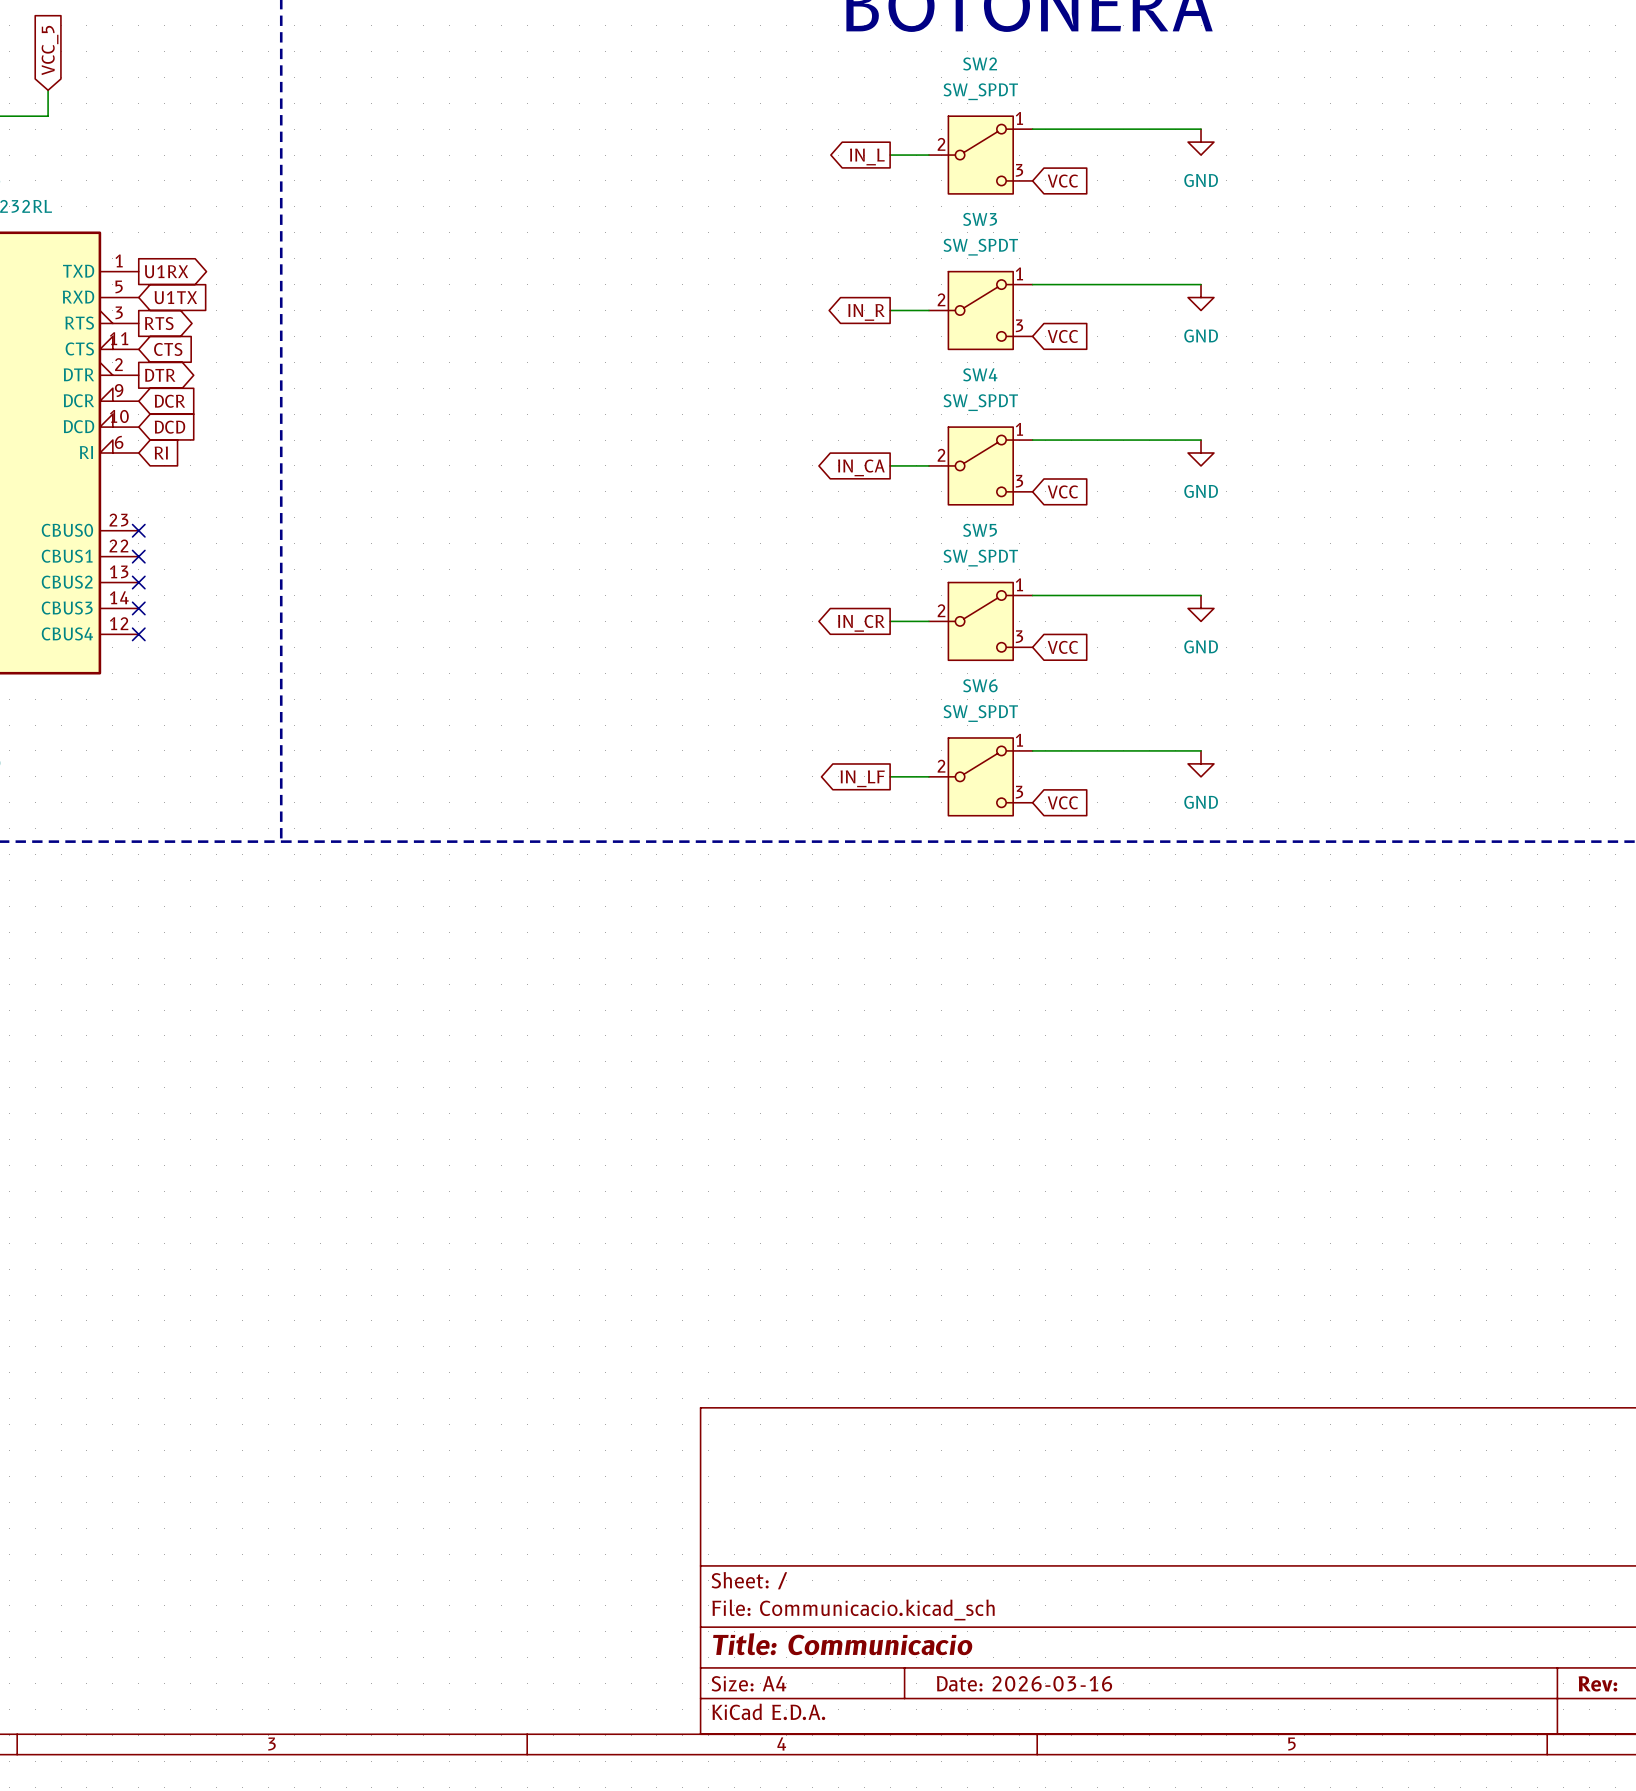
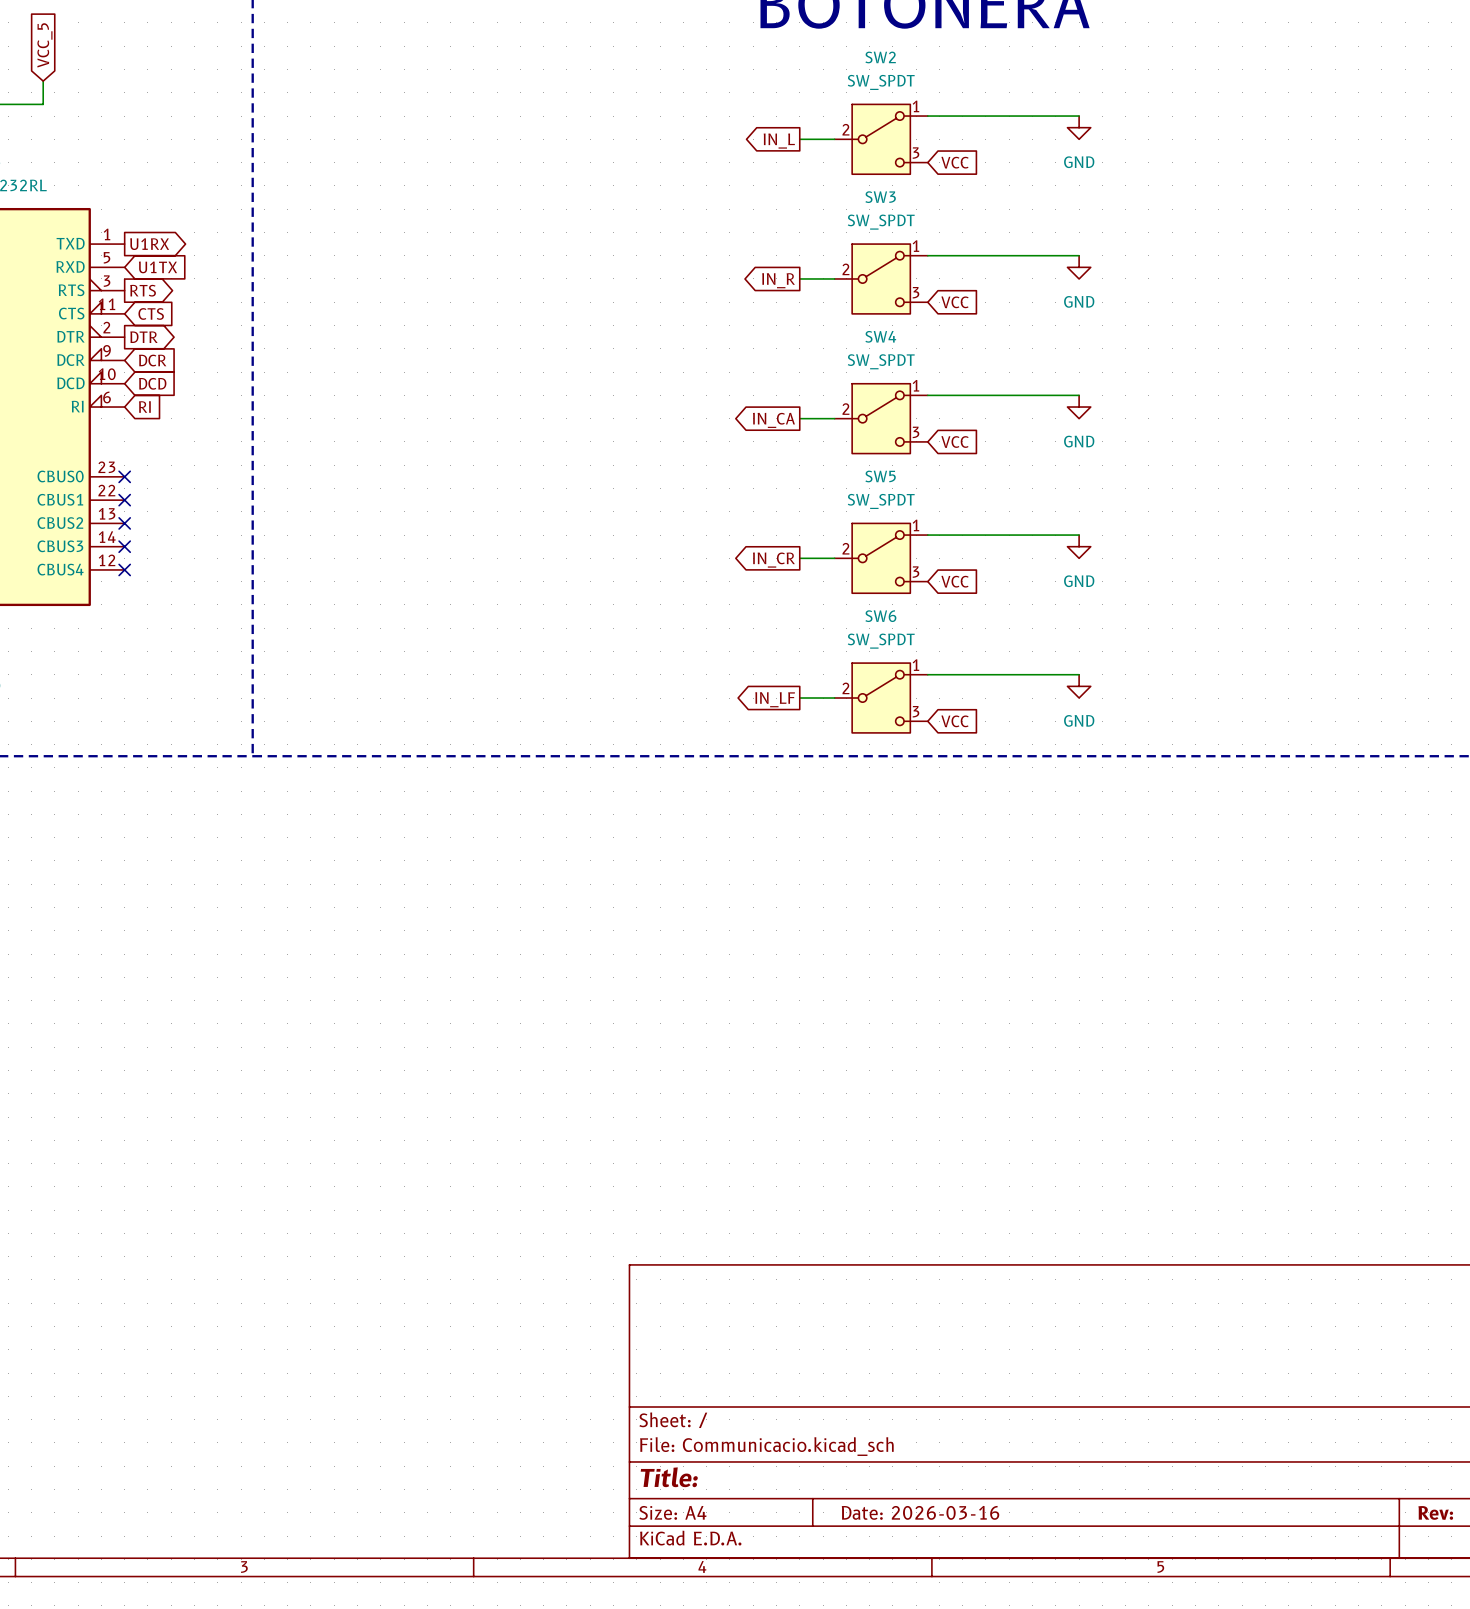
title block: Title: Communicacio (842, 1644) -> Title: (669, 1477)

